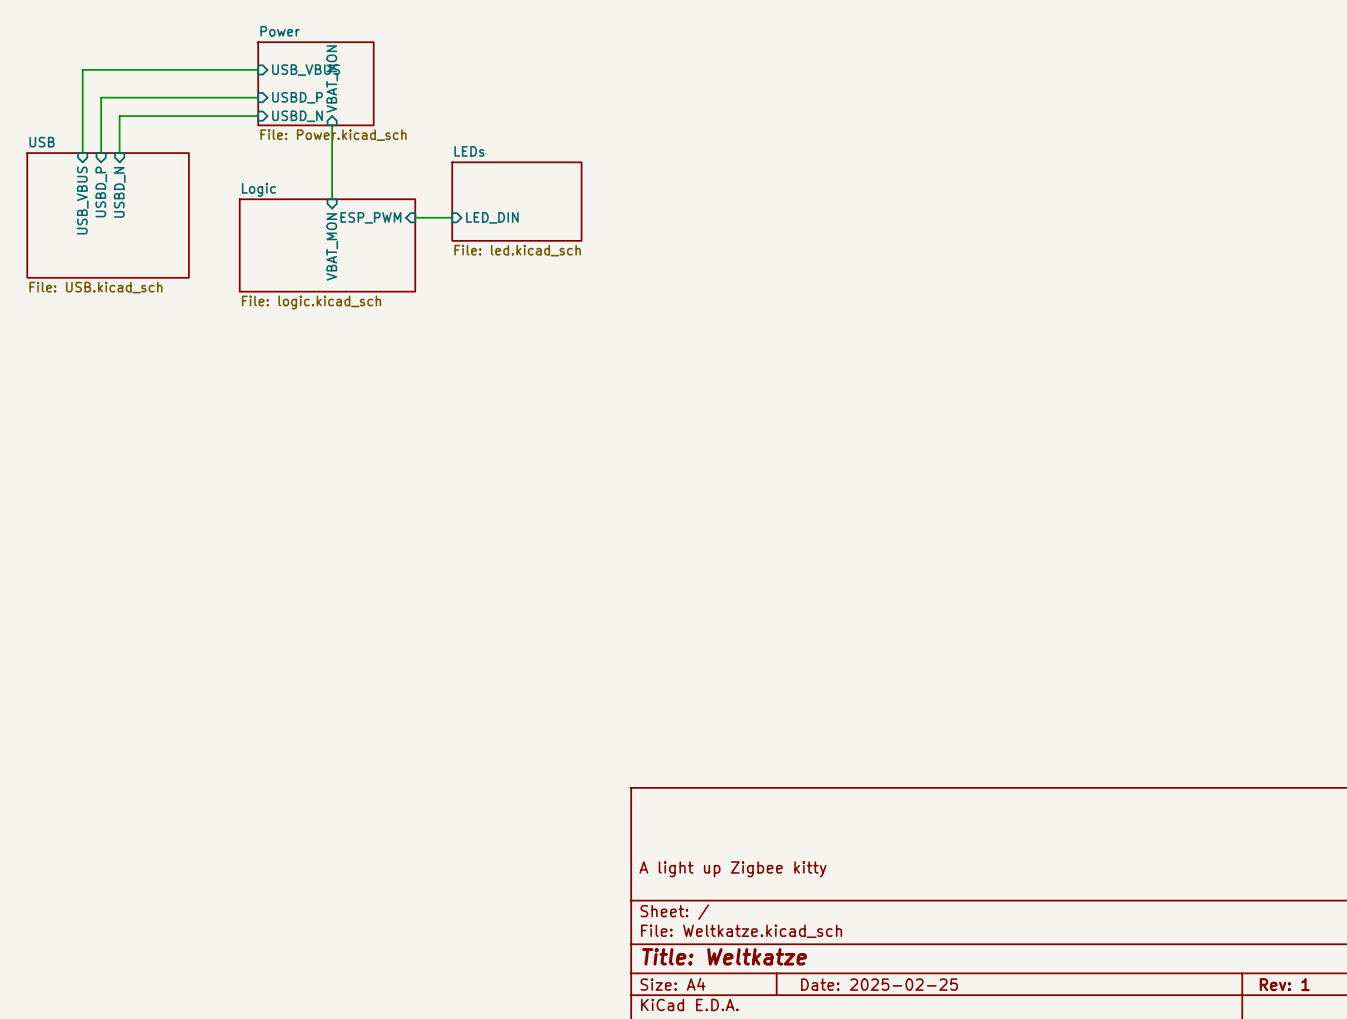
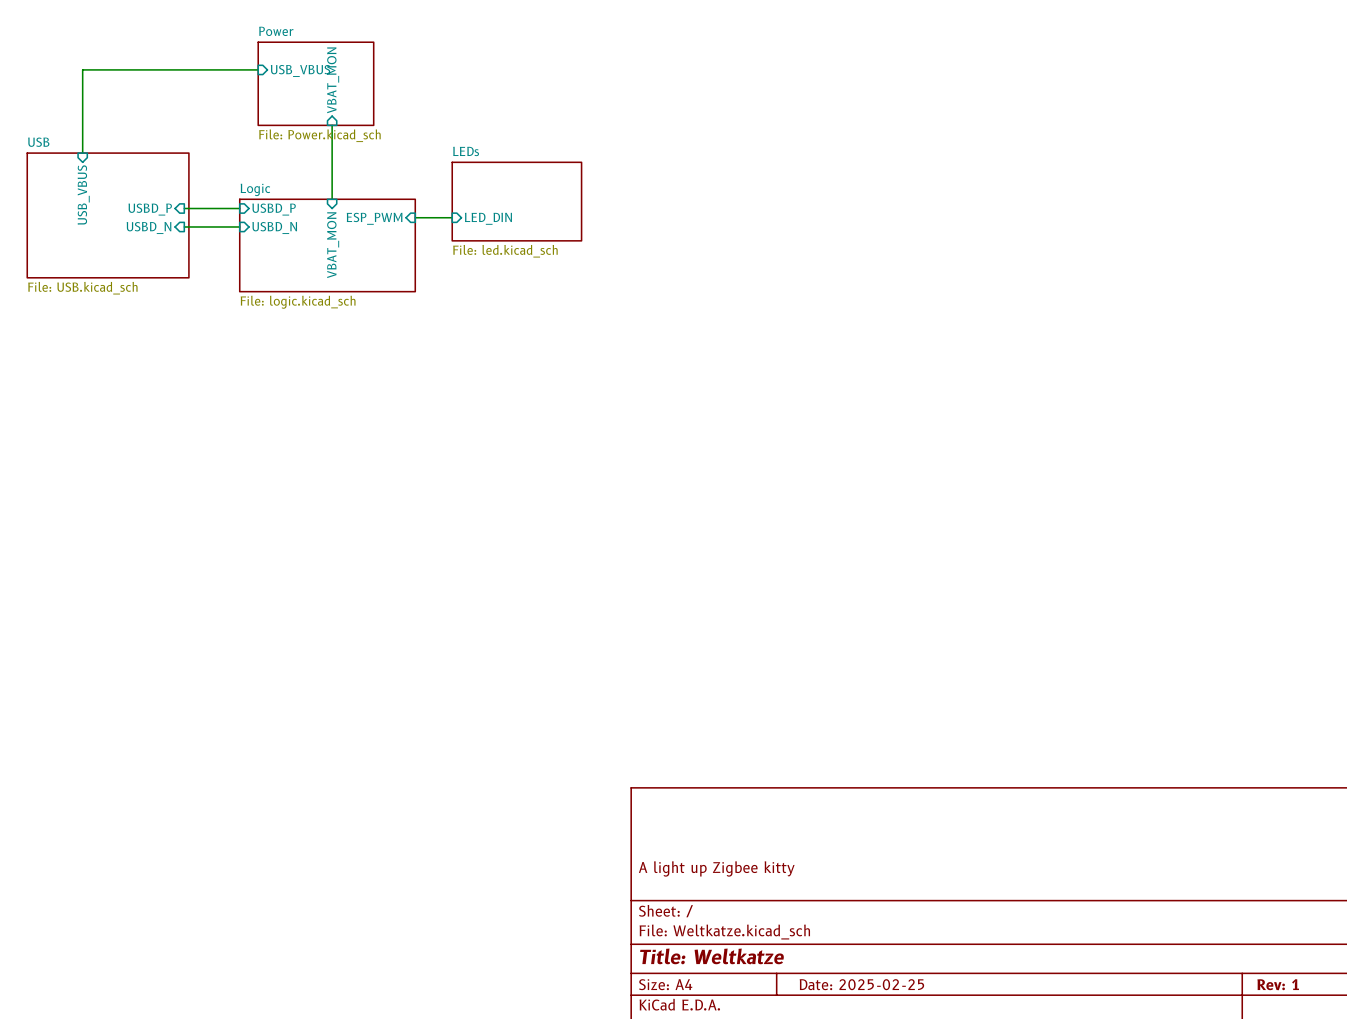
wire: (258, 97) (101, 97) (101, 153) -> none
sheet pin: USBD_P (297, 97) -> none
wire: (258, 116) (119, 116) (119, 153) -> none
sheet pin: USBD_N (297, 116) -> none
sheet pin: USBD_P (101, 191) -> none
sheet pin: USBD_N (119, 192) -> none
sheet pin: none -> USBD_P (150, 209)
wire: none -> (184, 208) (239, 208)
sheet pin: none -> USBD_P (274, 209)
wire: none -> (184, 226) (239, 226)
sheet pin: none -> USBD_N (149, 228)
sheet pin: none -> USBD_N (274, 228)

